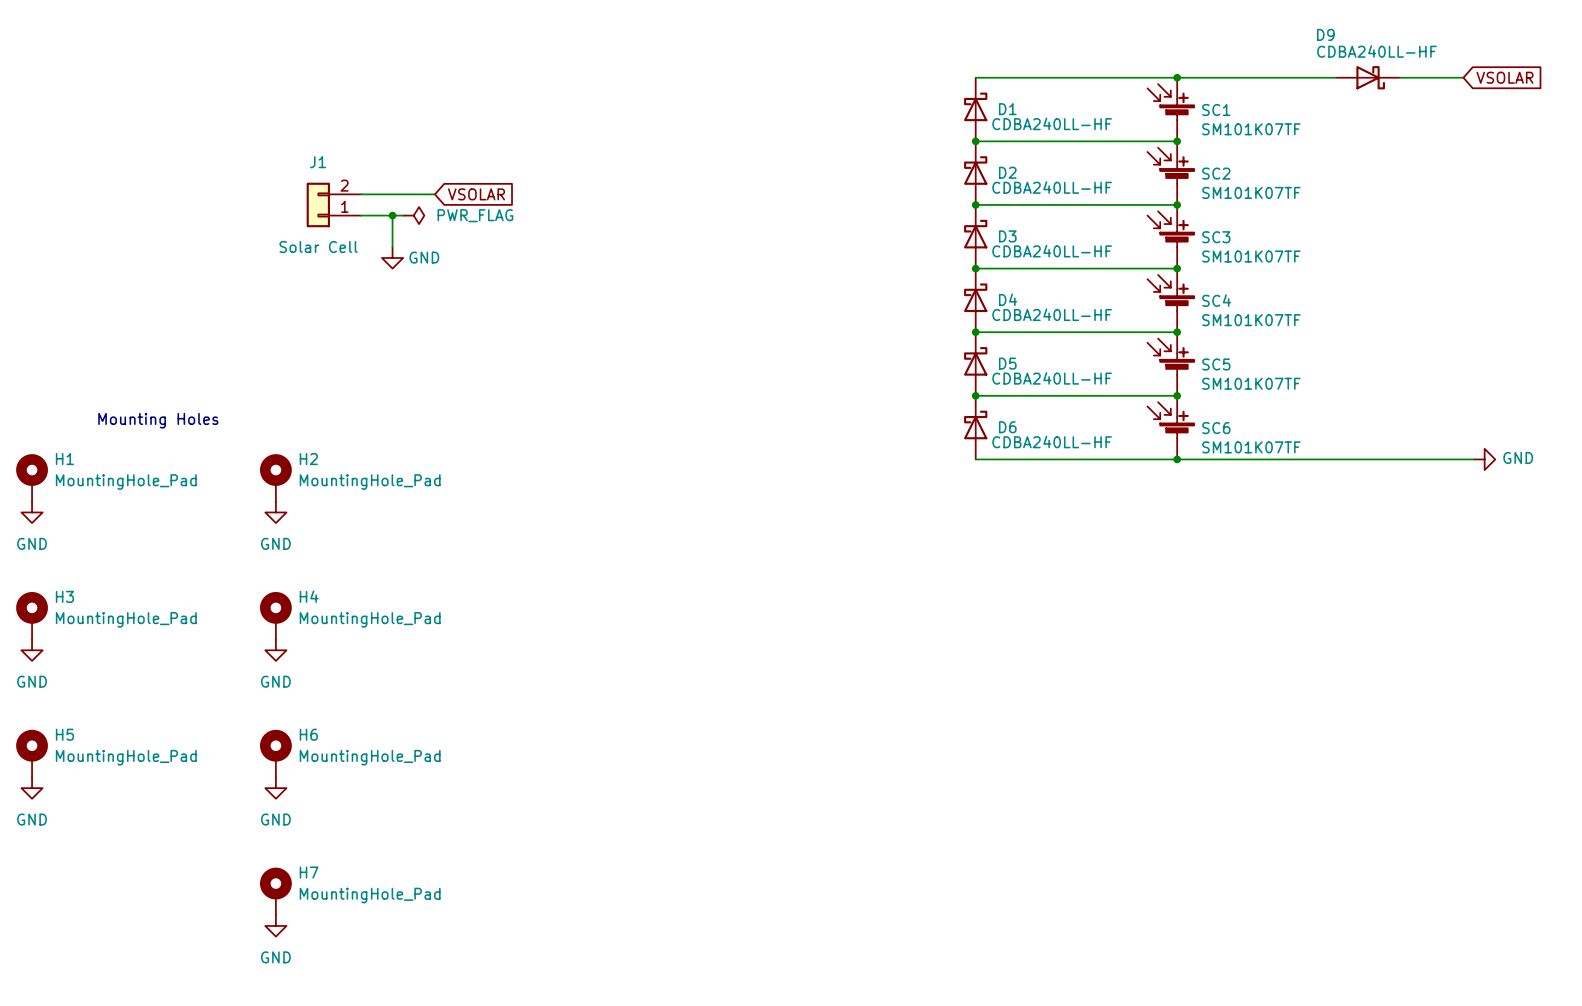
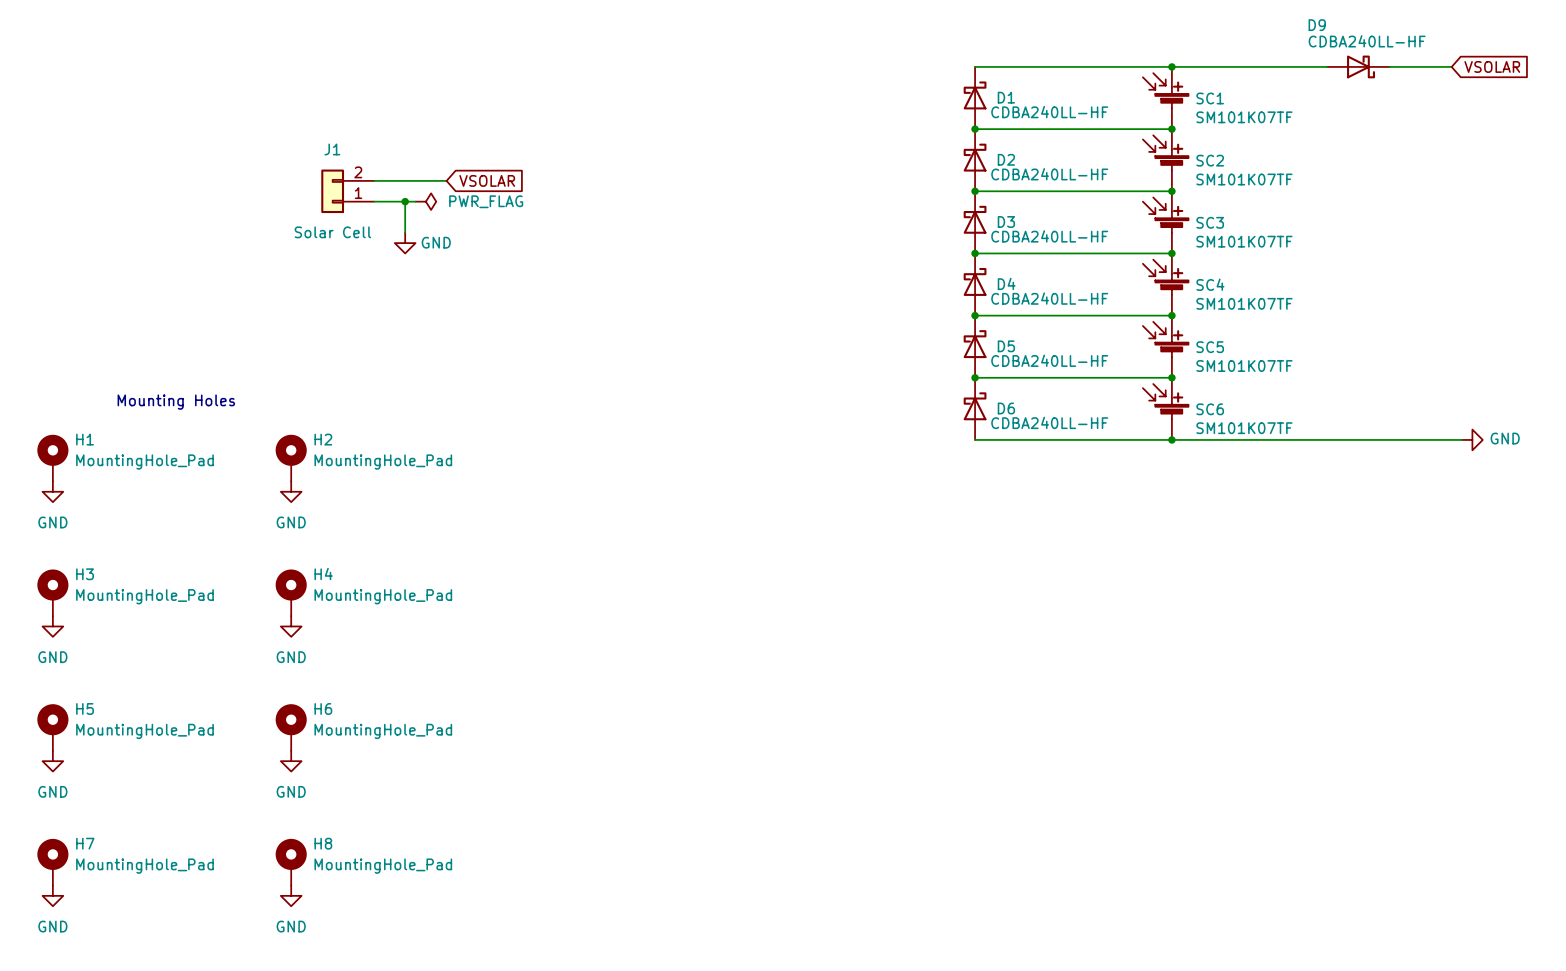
H7 name: H7 (309, 872) -> H8 (323, 843)
H7: none -> MountingHole_Pad (52, 862)
power symbol: none -> GND (52, 895)

